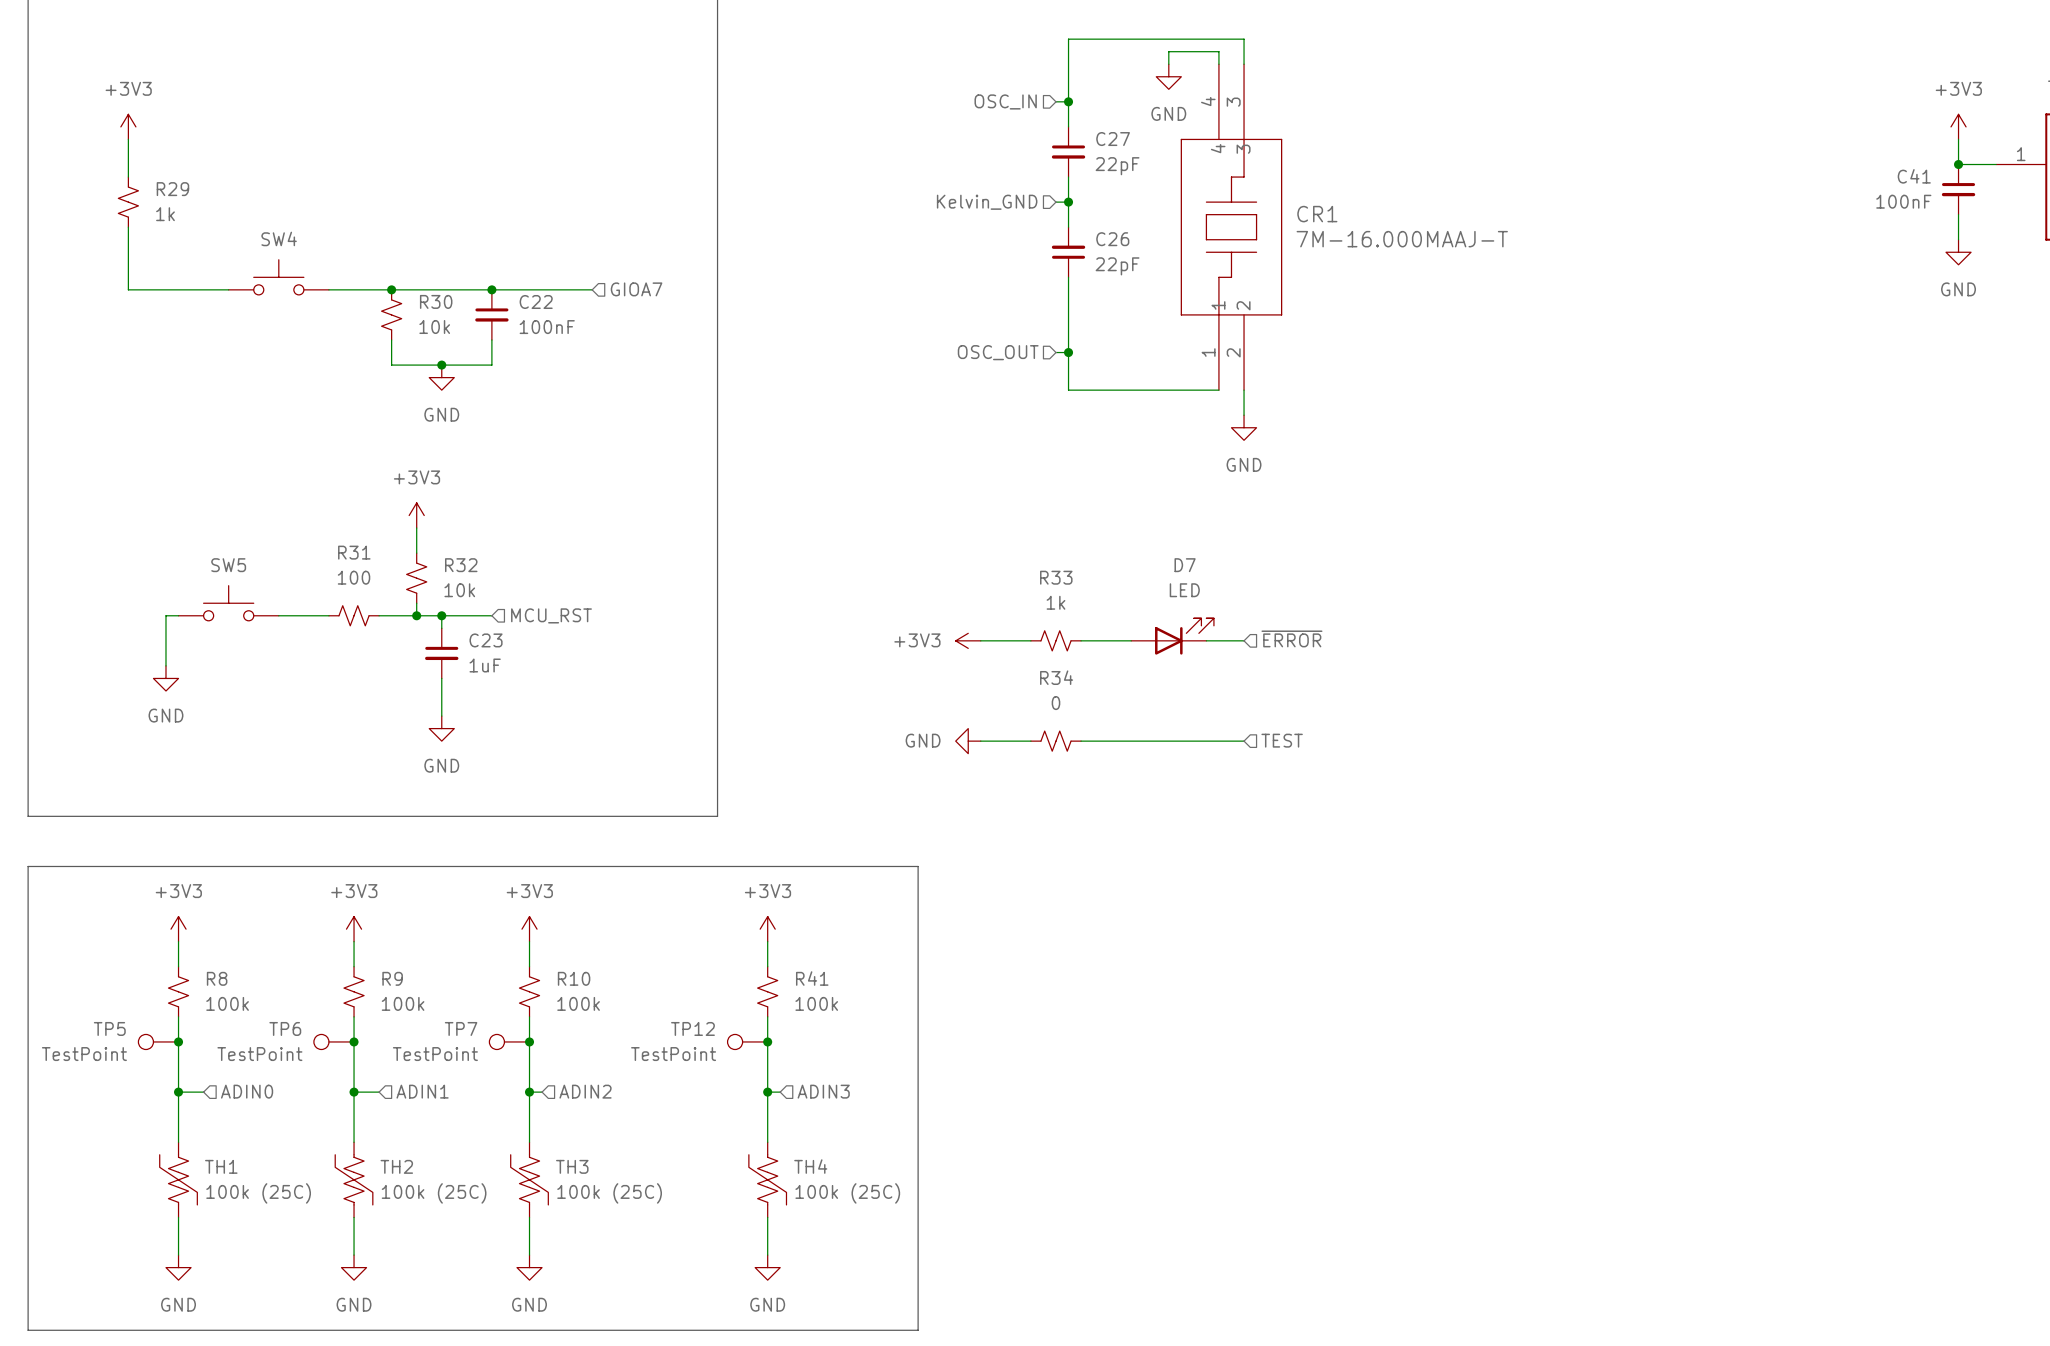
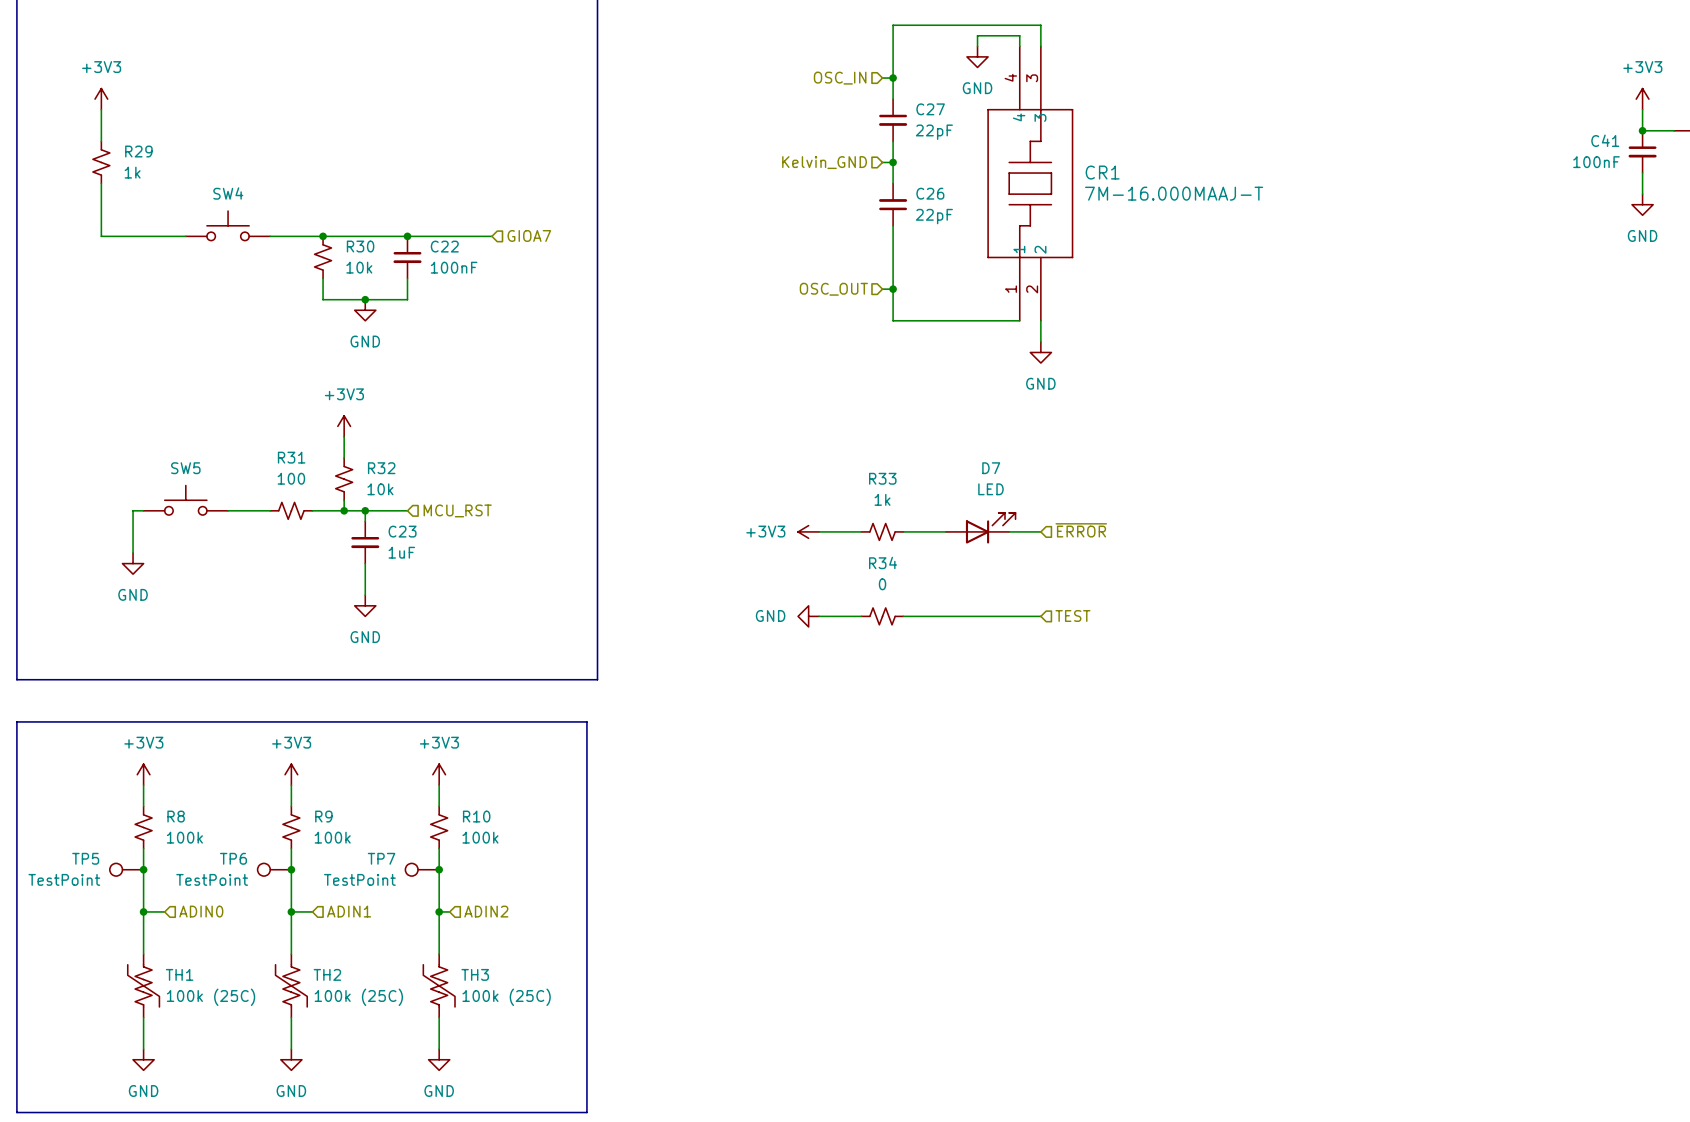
line: (705, 866) (918, 866) (918, 1330) (705, 1330) -> (586, 721) (586, 1112)
power symbol: +3V3 (767, 929) -> none
wire: (767, 941) (767, 966) -> none
R41: 100k (767, 991) -> none
wire: (767, 1016) (767, 1142) -> none
TP12: TestPoint (747, 1041) -> none
junction: (767, 1041) -> none
hierarchical label: ADIN3 (823, 1091) -> none
wire: (767, 1092) (780, 1092) -> none
junction: (767, 1092) -> none
TH4: 100k (25C) (767, 1179) -> none
wire: (767, 1217) (767, 1255) -> none
power symbol: GND (767, 1267) -> none

